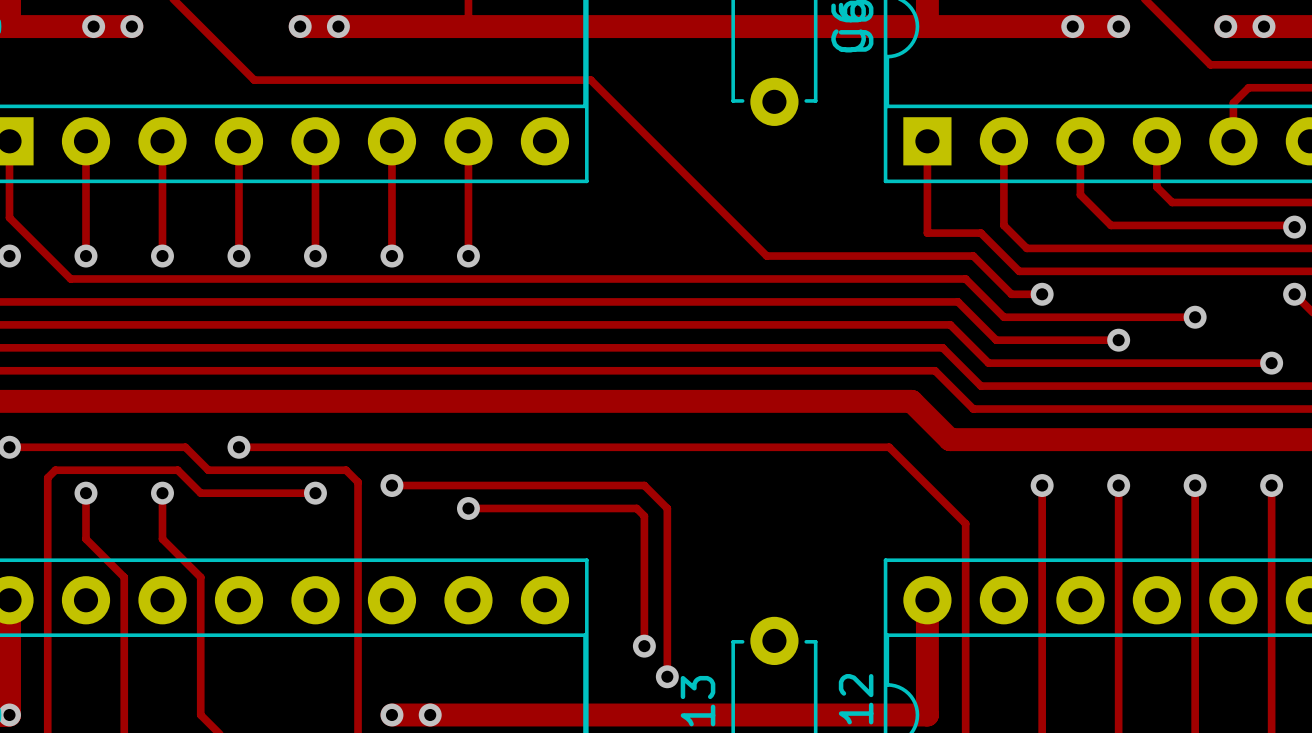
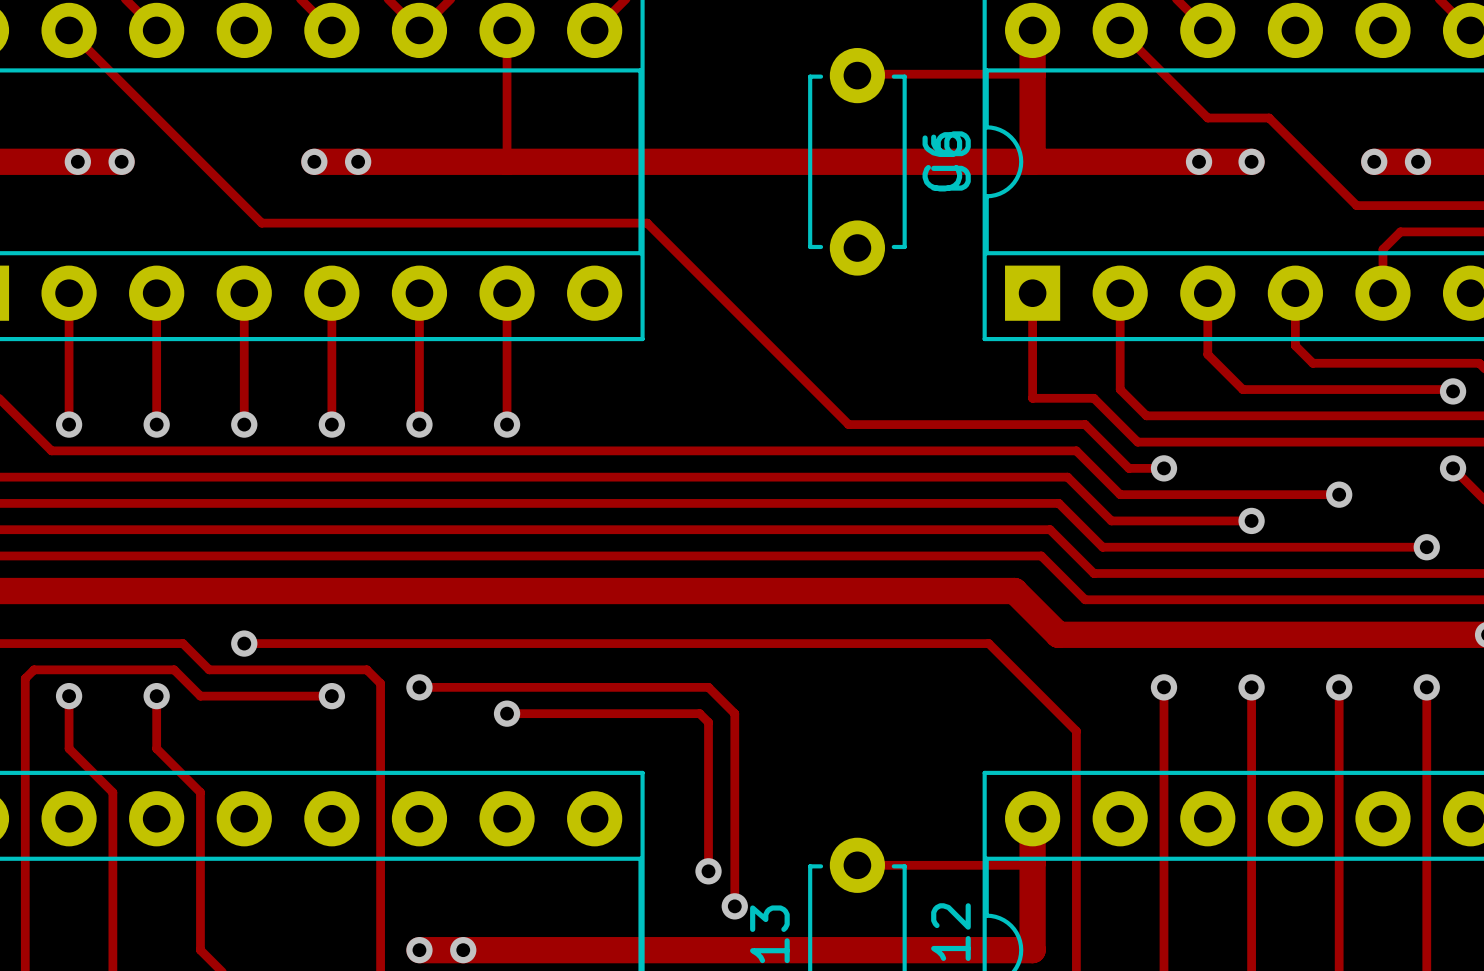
track: none -> (1032, 862) (1029, 865) (857, 865)

